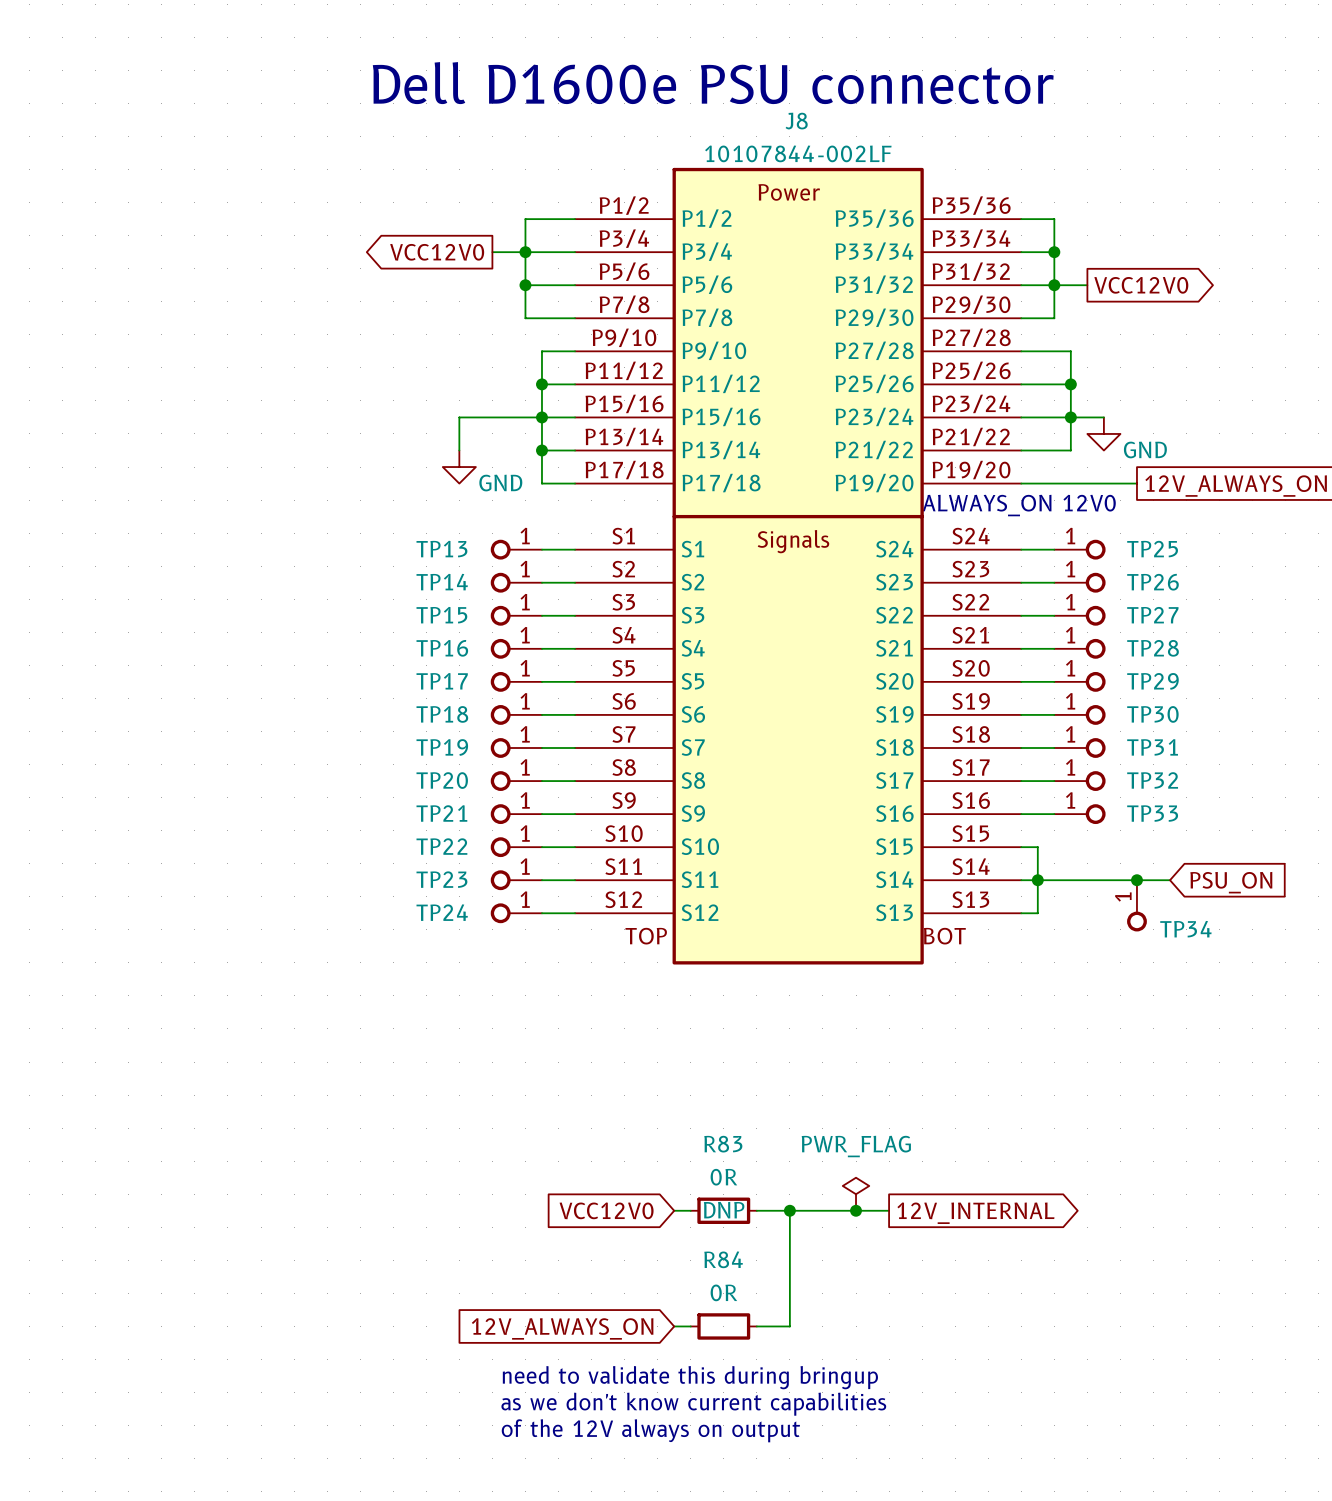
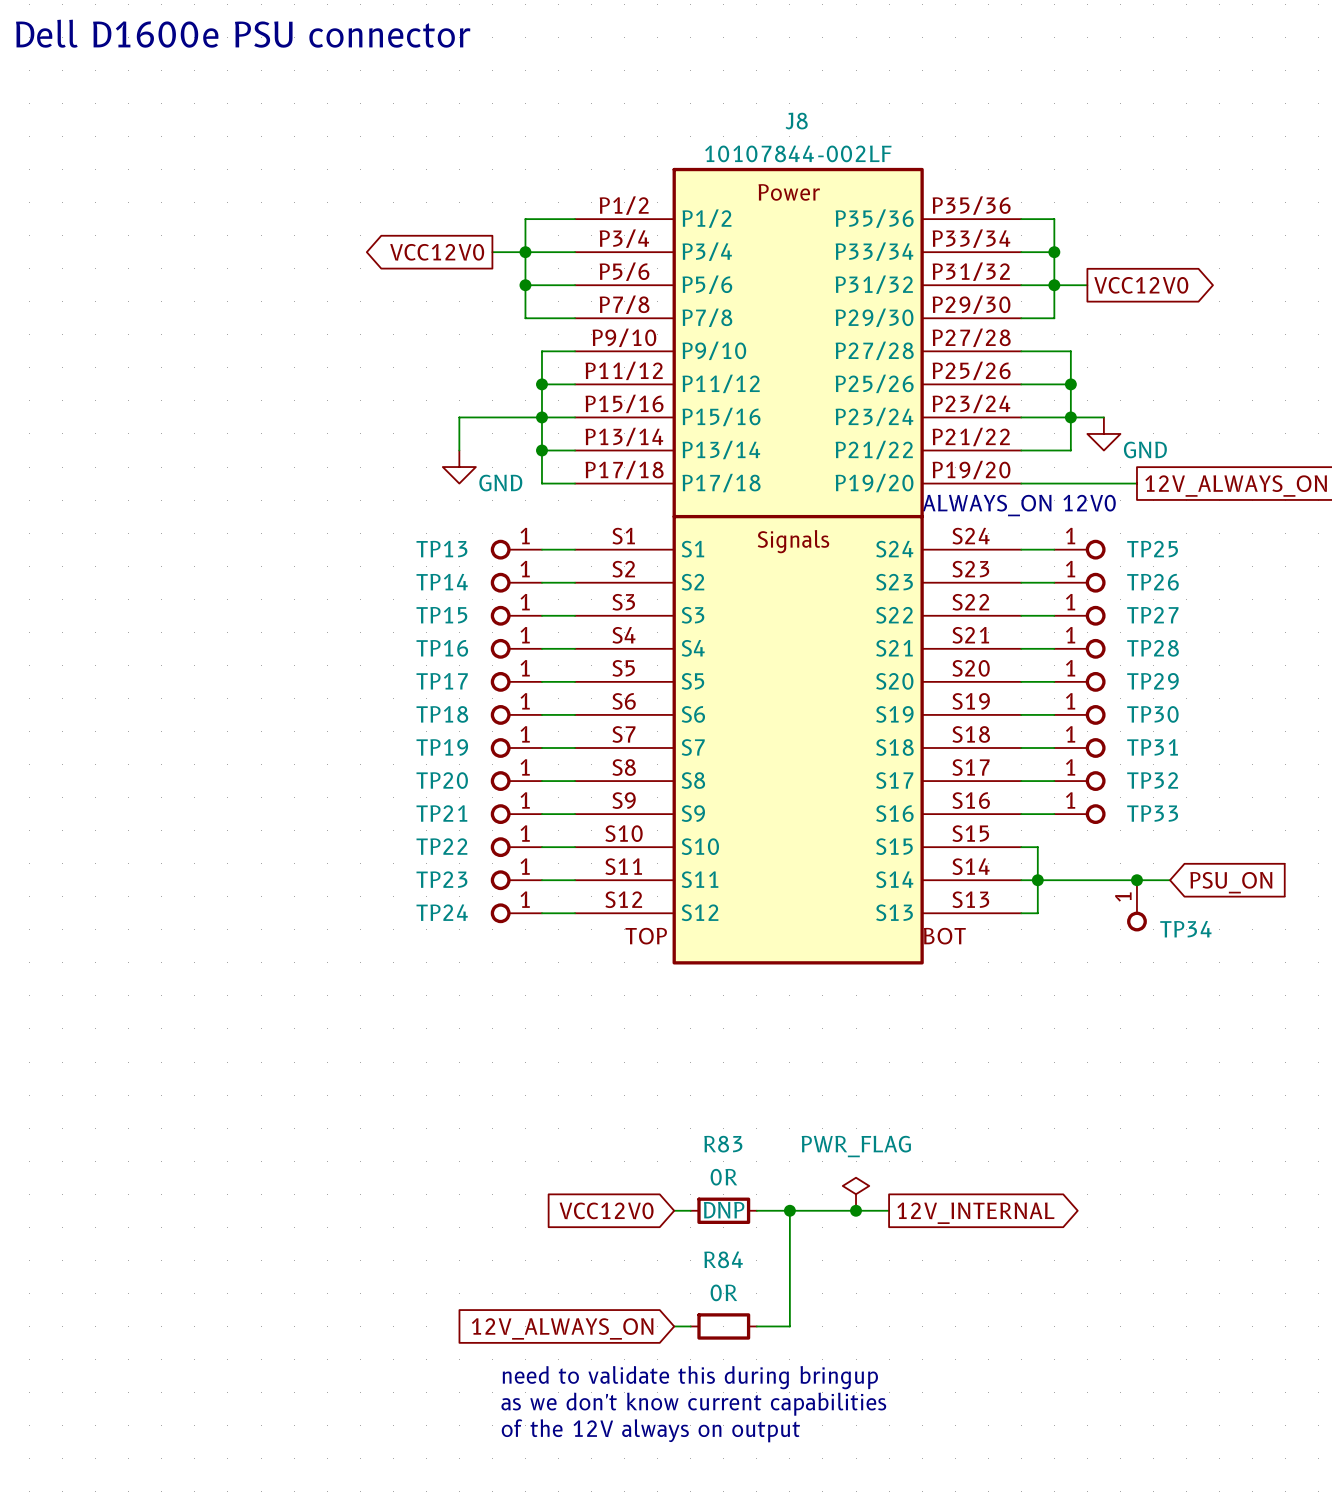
text: none -> Dell D1600e PSU connector (243, 33)
text: Dell D1600e PSU connector (713, 83) -> none

